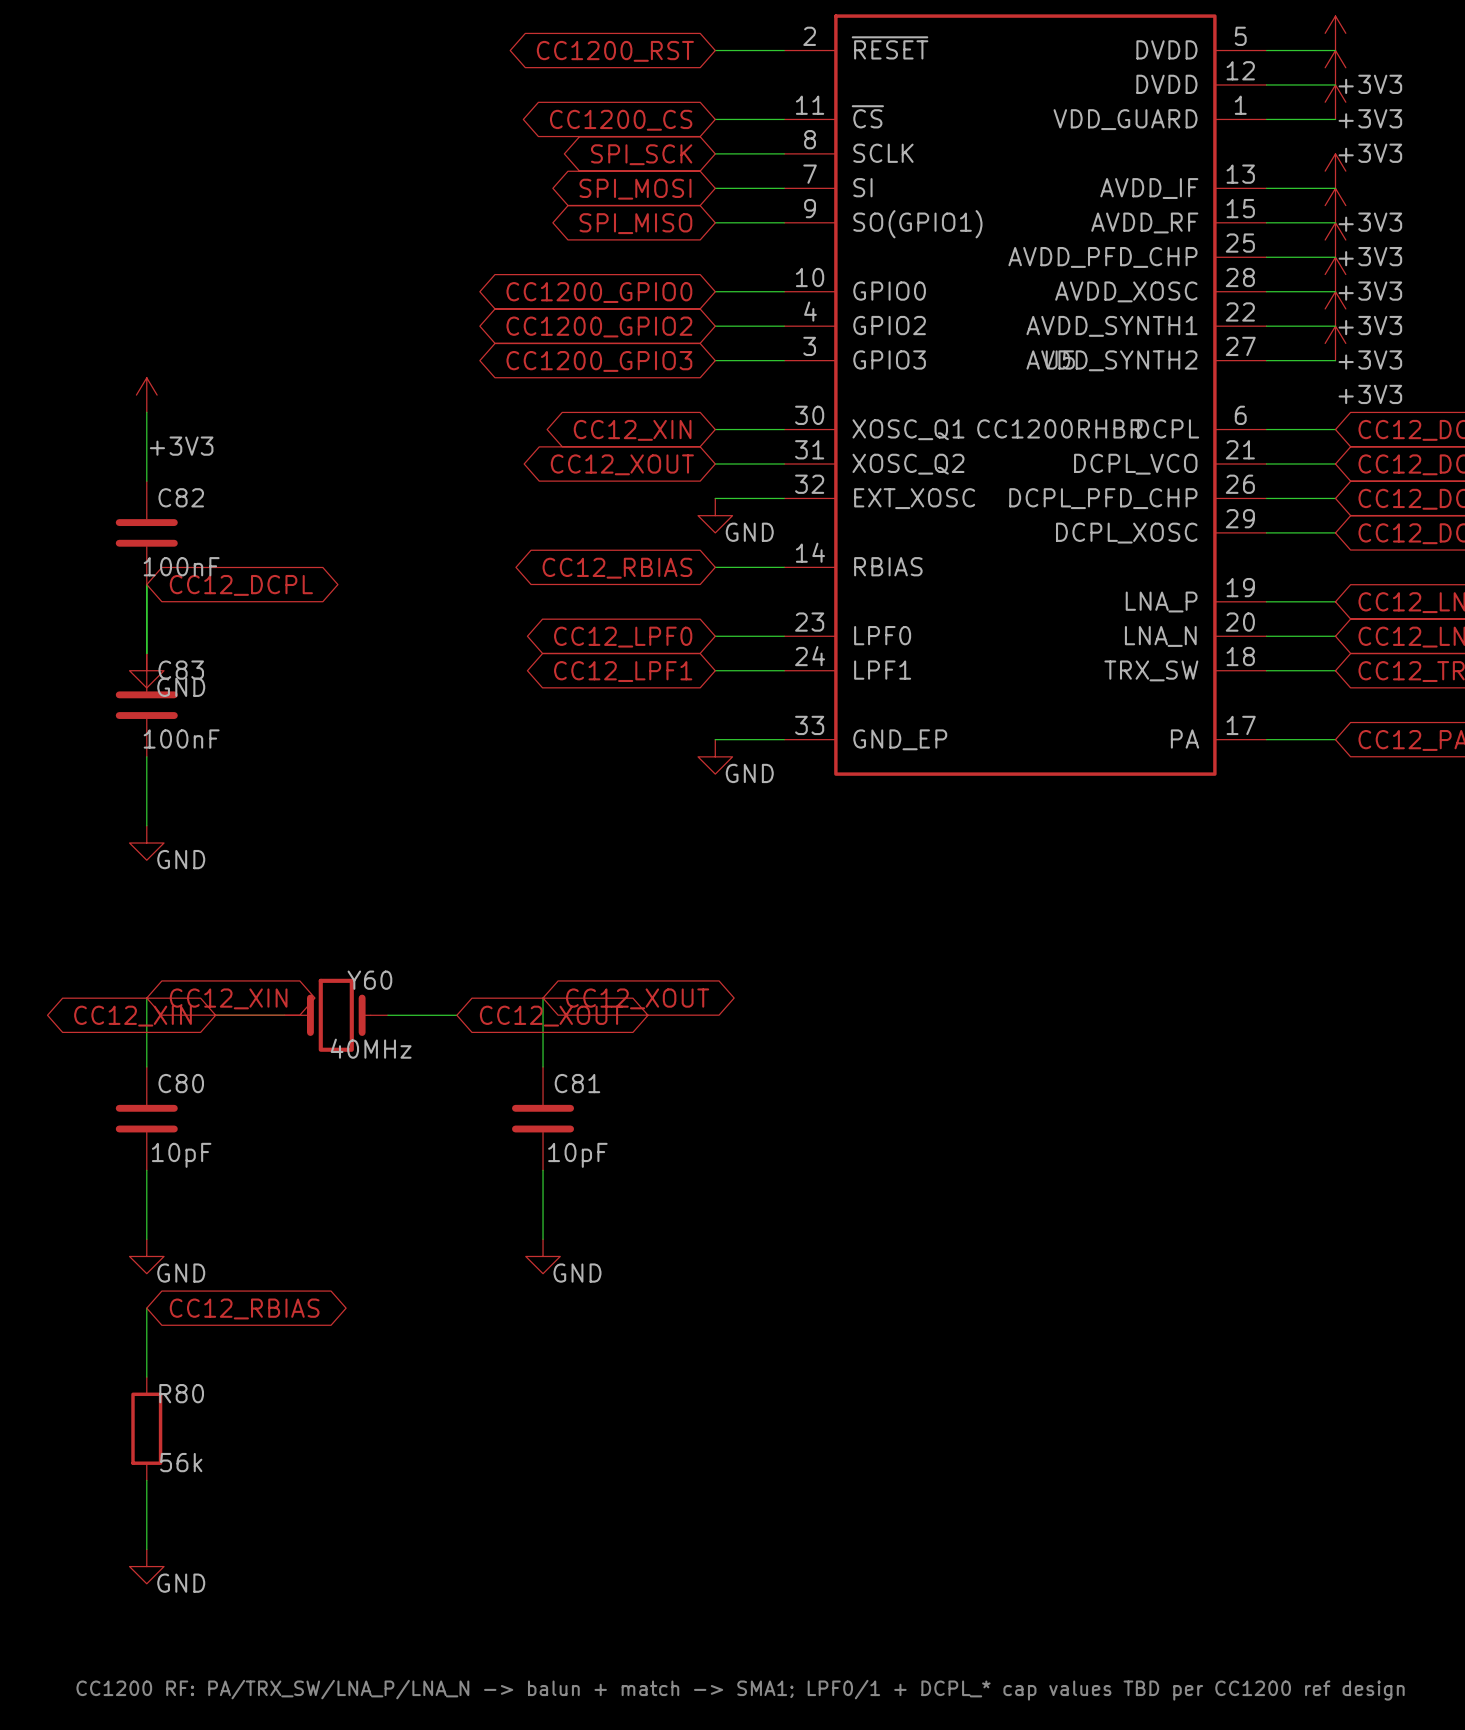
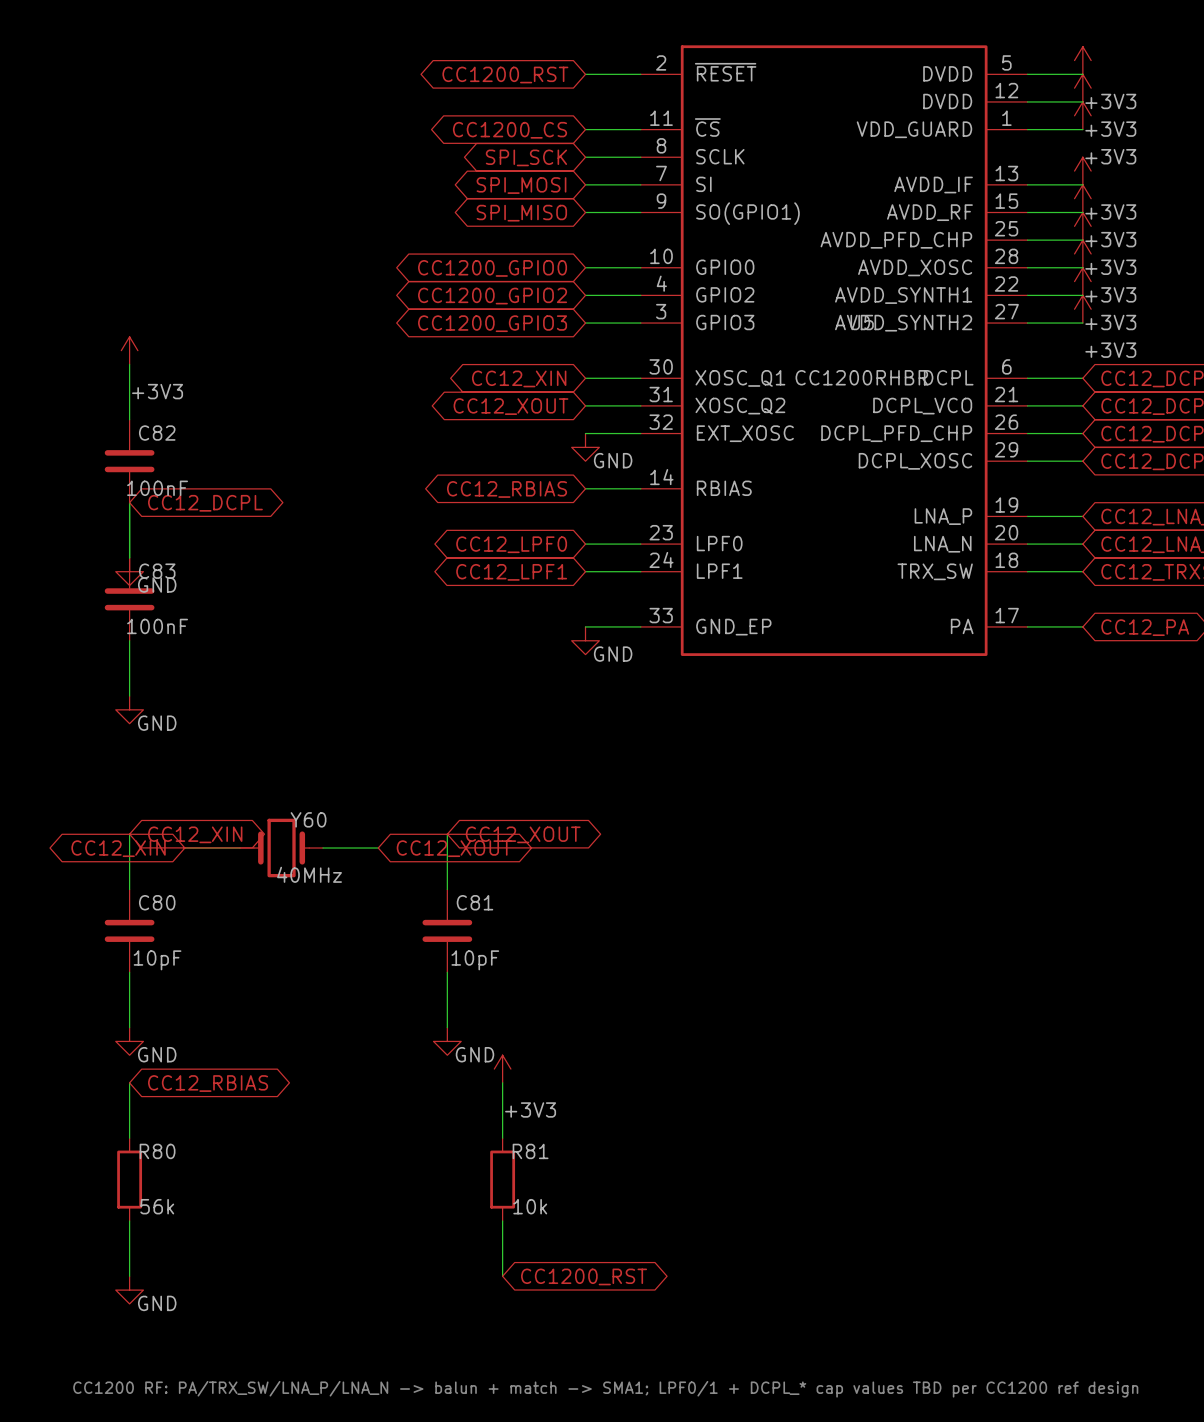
power symbol: none -> +3V3 (502, 1069)
wire: none -> (502, 1082) (502, 1138)
R81: none -> 10k (502, 1179)
wire: none -> (502, 1221) (502, 1276)
global label: none -> CC1200_RST (584, 1276)

